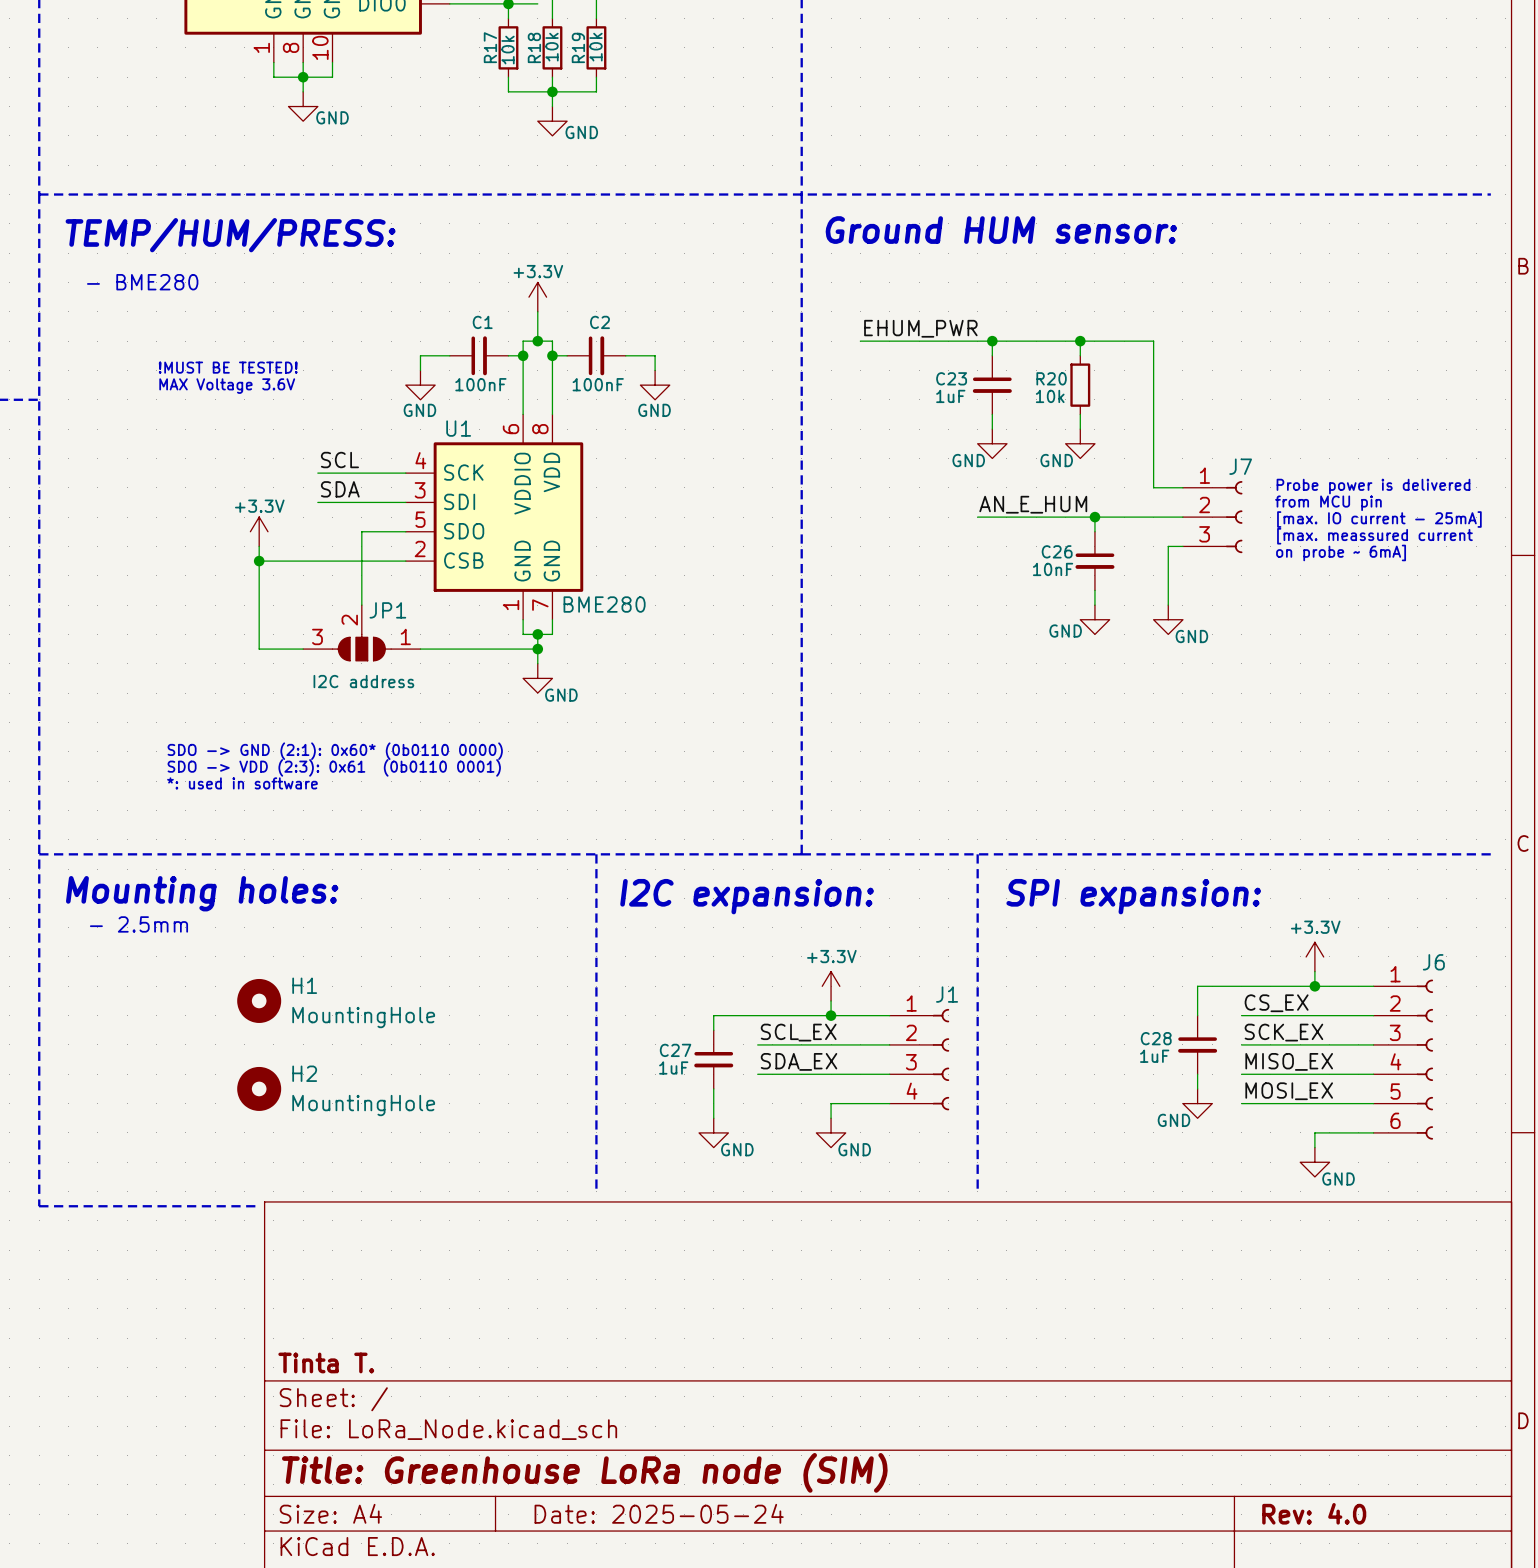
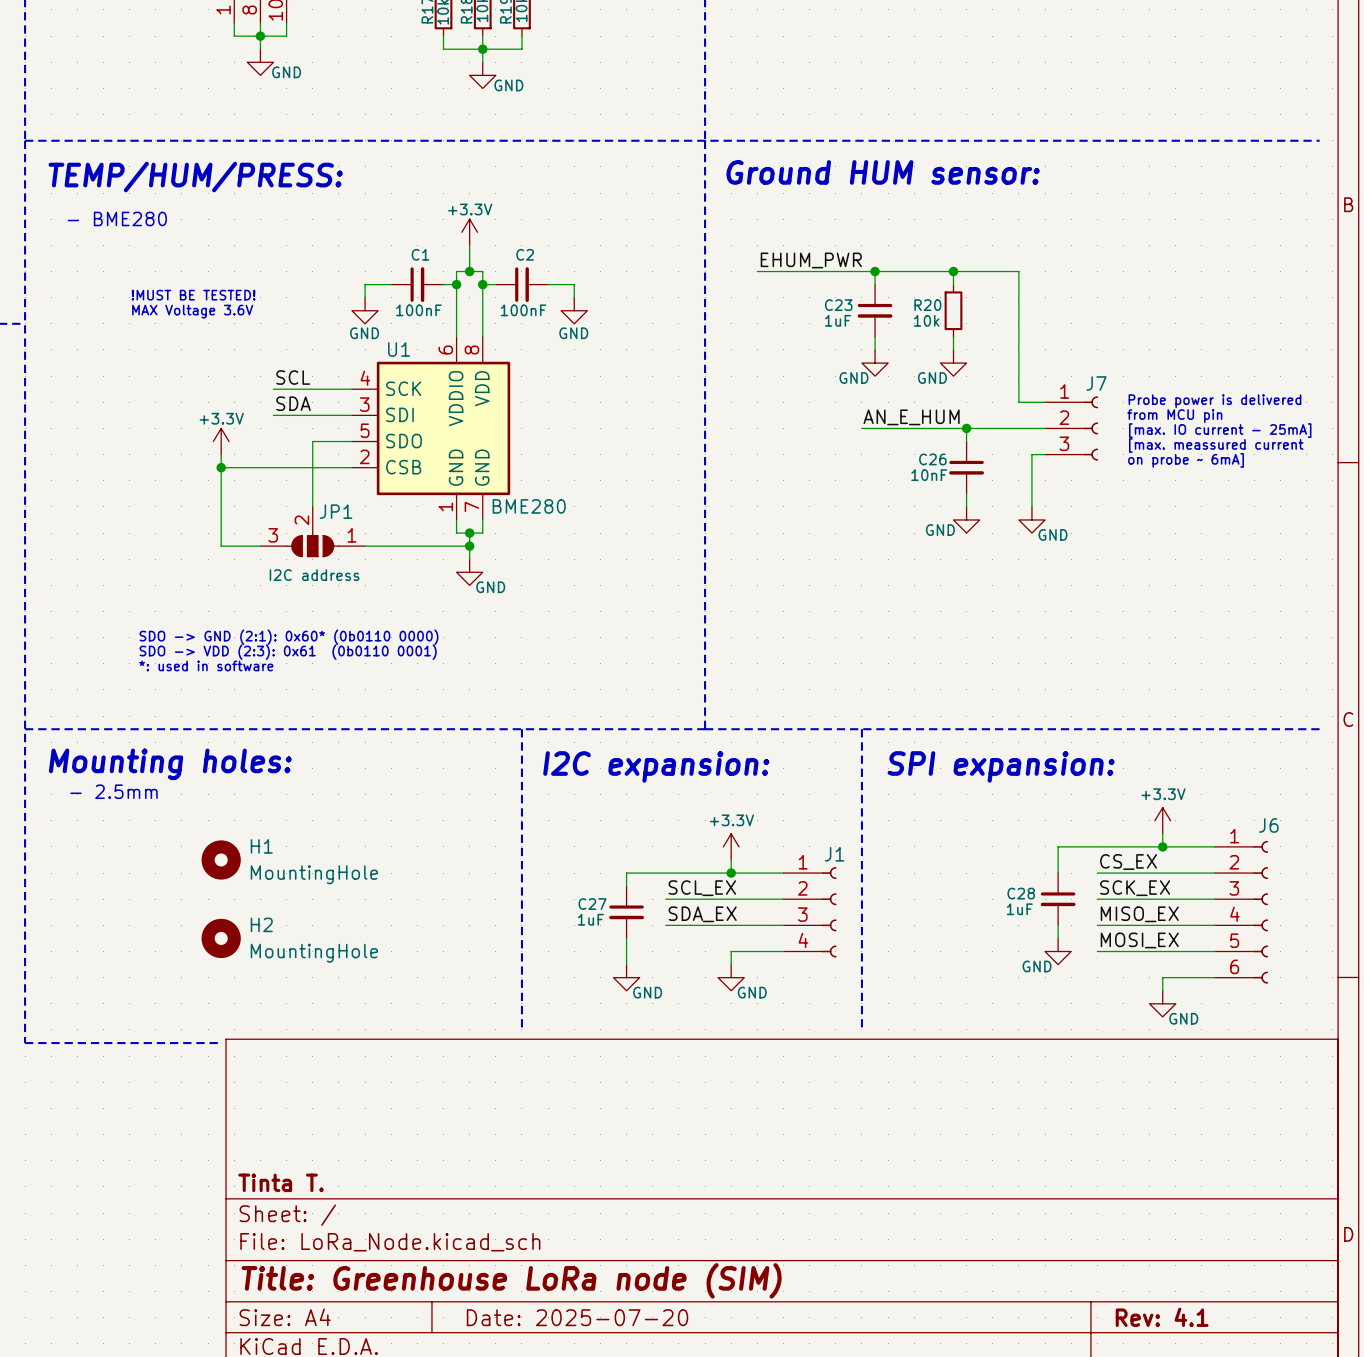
title block: Date: 2025-05-24 (659, 1513) -> Date: 2025-07-20 (577, 1317)
title block: Rev: 4.0 (1314, 1513) -> Rev: 4.1 (1162, 1317)

